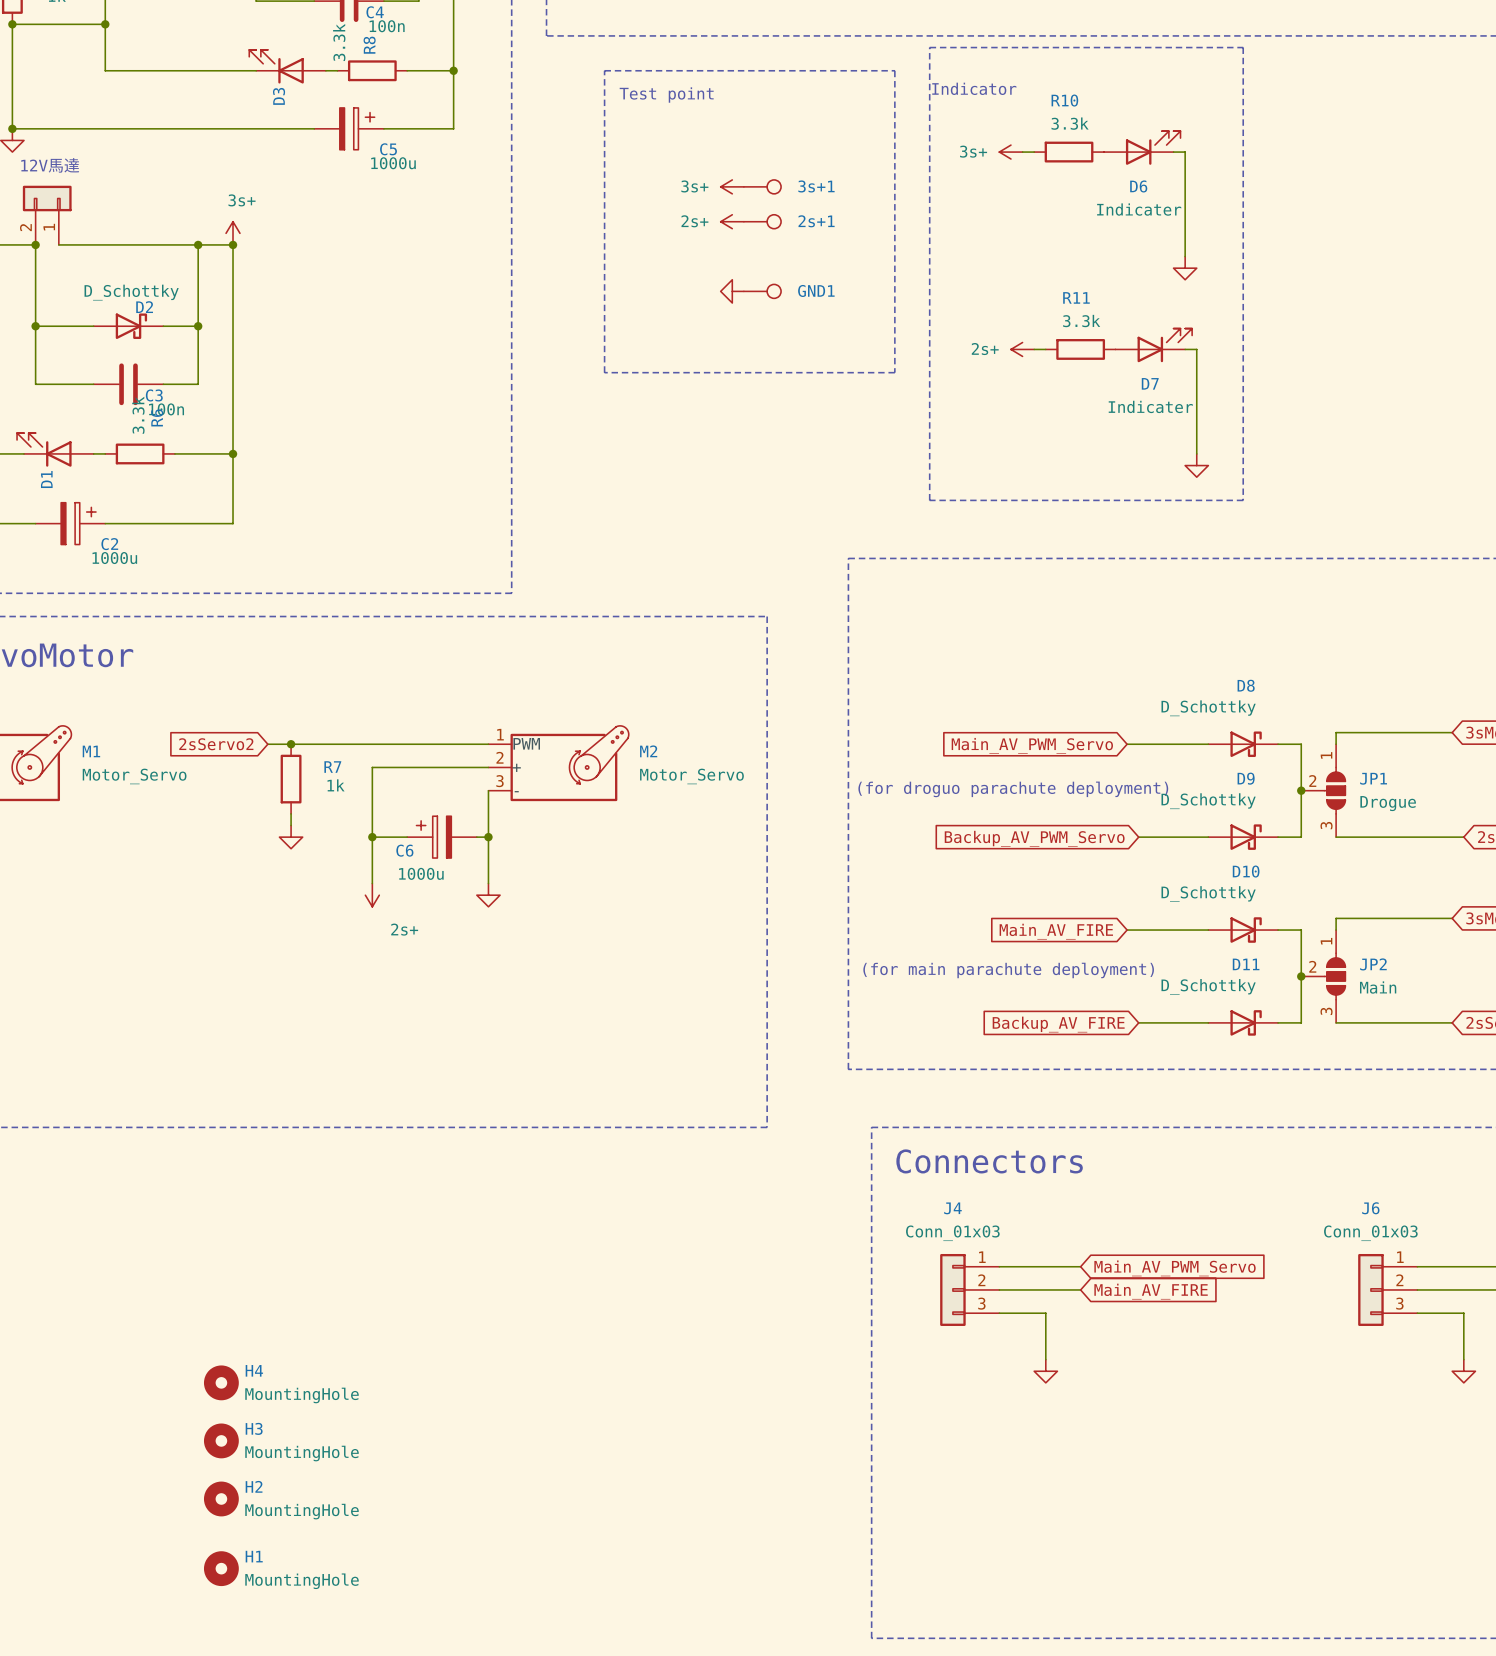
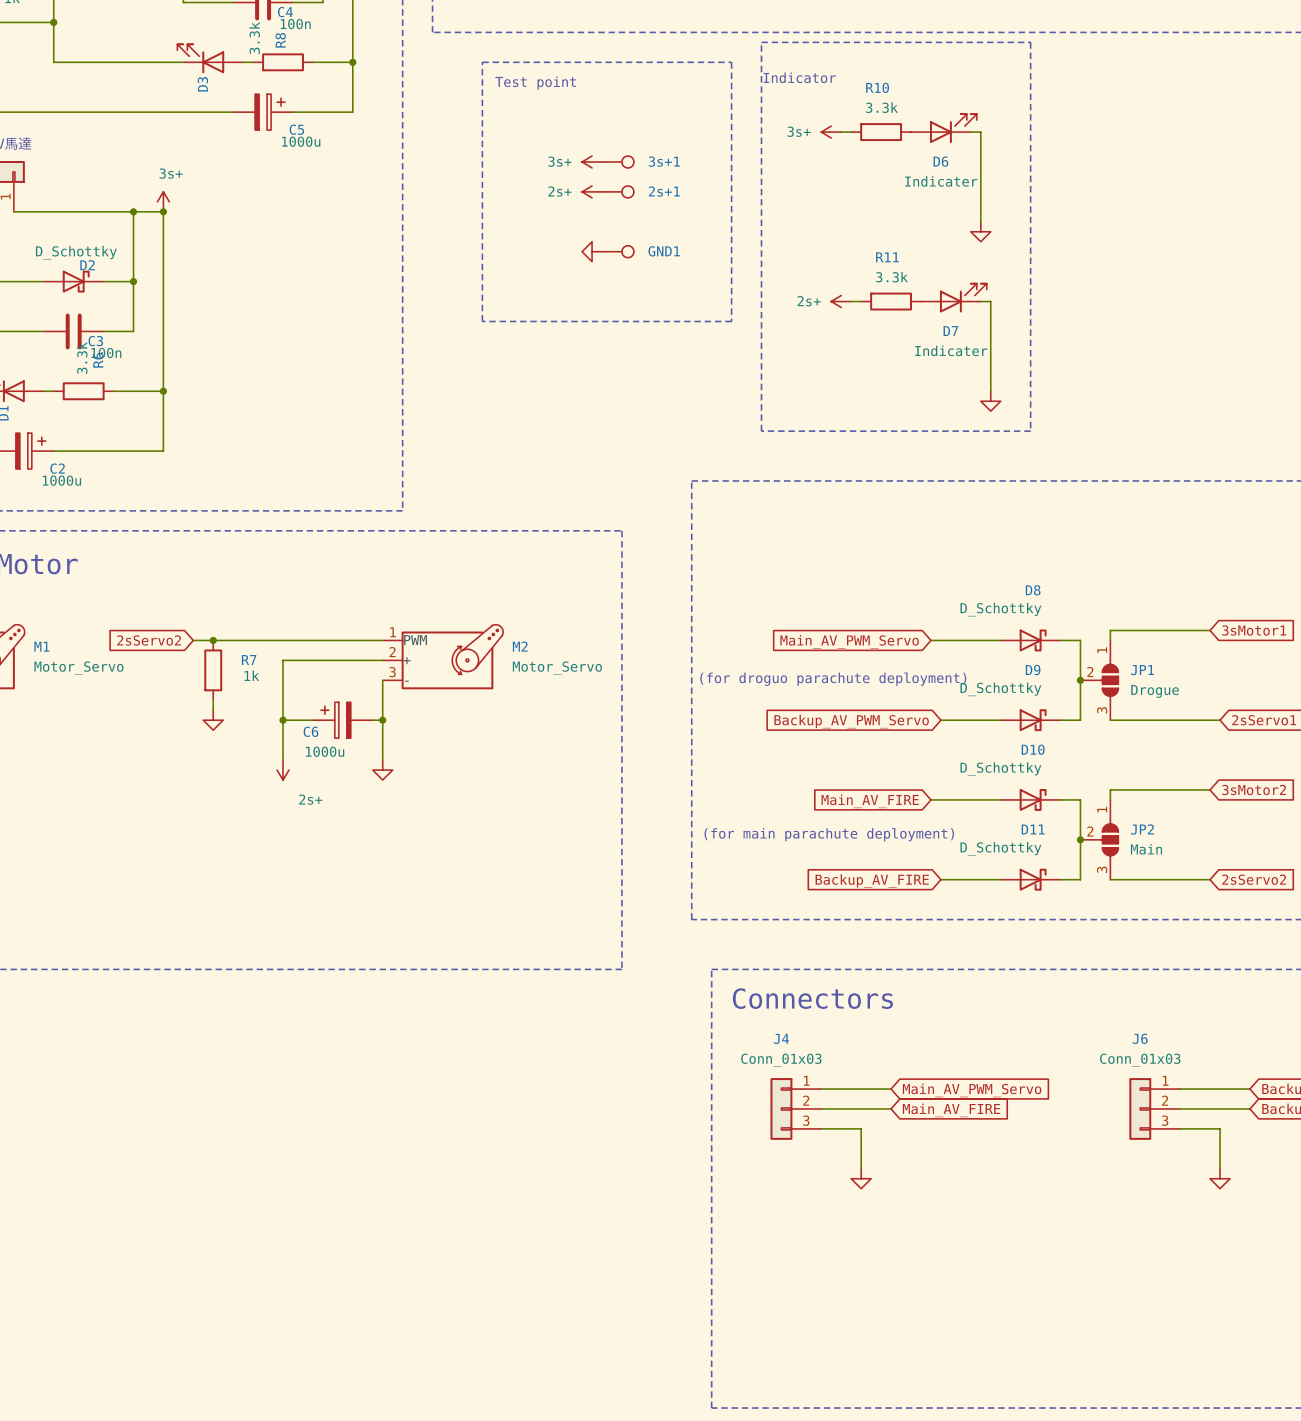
H4: MountingHole (221, 1382) -> none
H3: MountingHole (221, 1440) -> none
H2: MountingHole (221, 1498) -> none
H1: MountingHole (221, 1568) -> none

